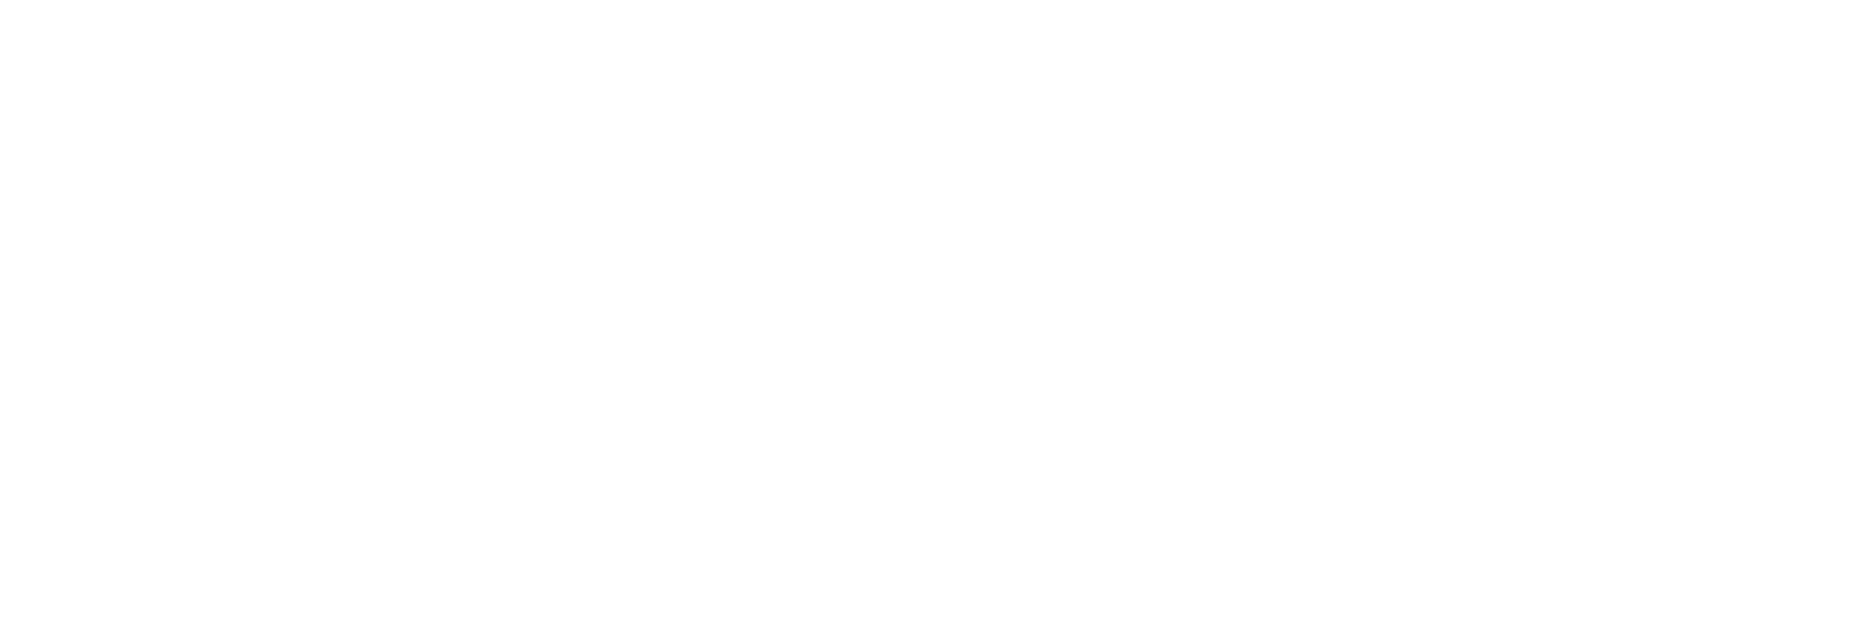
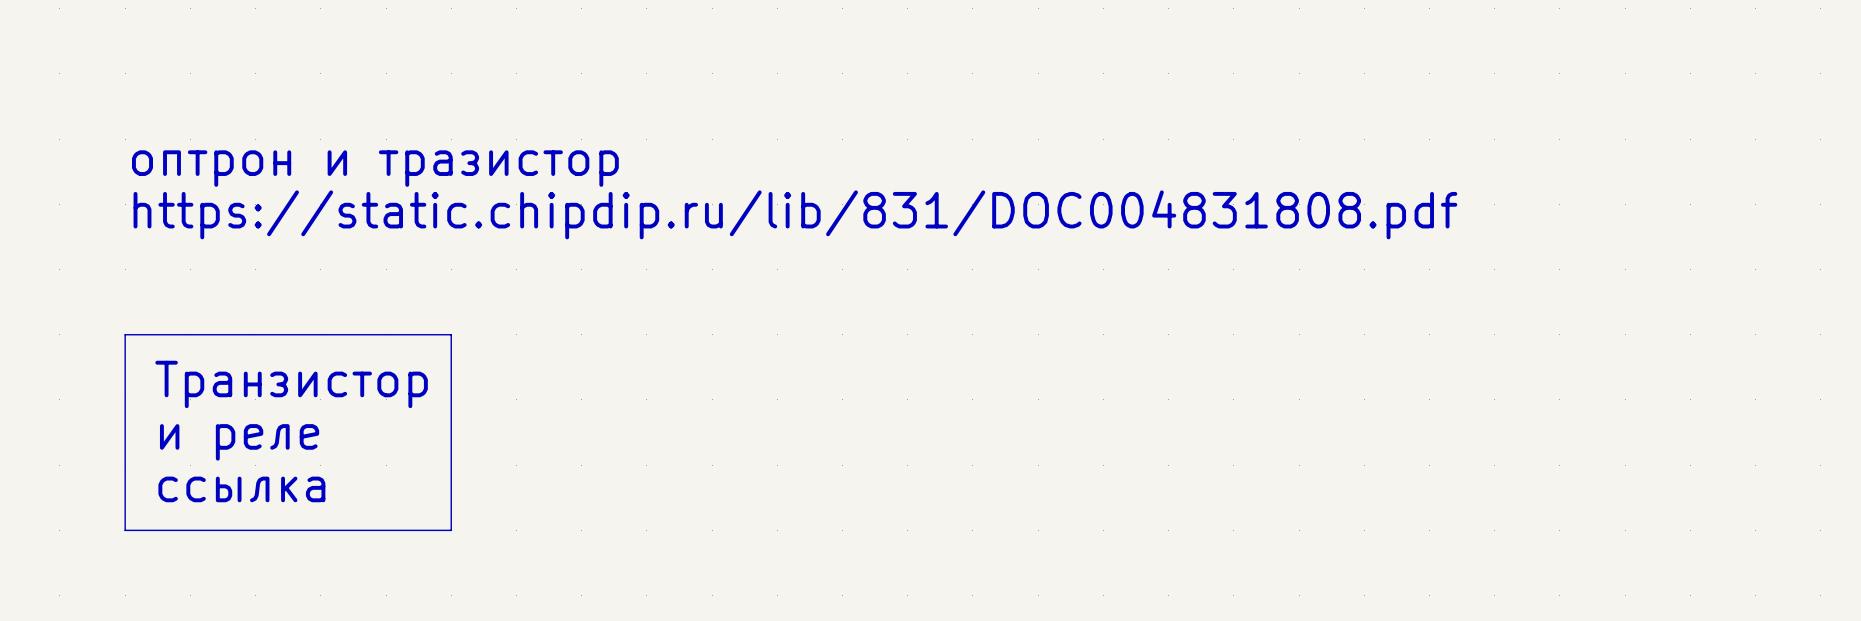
text: none -> оптрон и тразистор (375, 168)
text: none -> https://static.chipdip.ru/lib/831/DOC004831808.pdf (795, 214)
line: none -> (125, 334) (451, 334) (451, 530) (125, 530) (125, 334)
text: none -> Транзистор (291, 384)
text: none -> и реле (239, 442)
text: none -> ссылка (241, 489)

